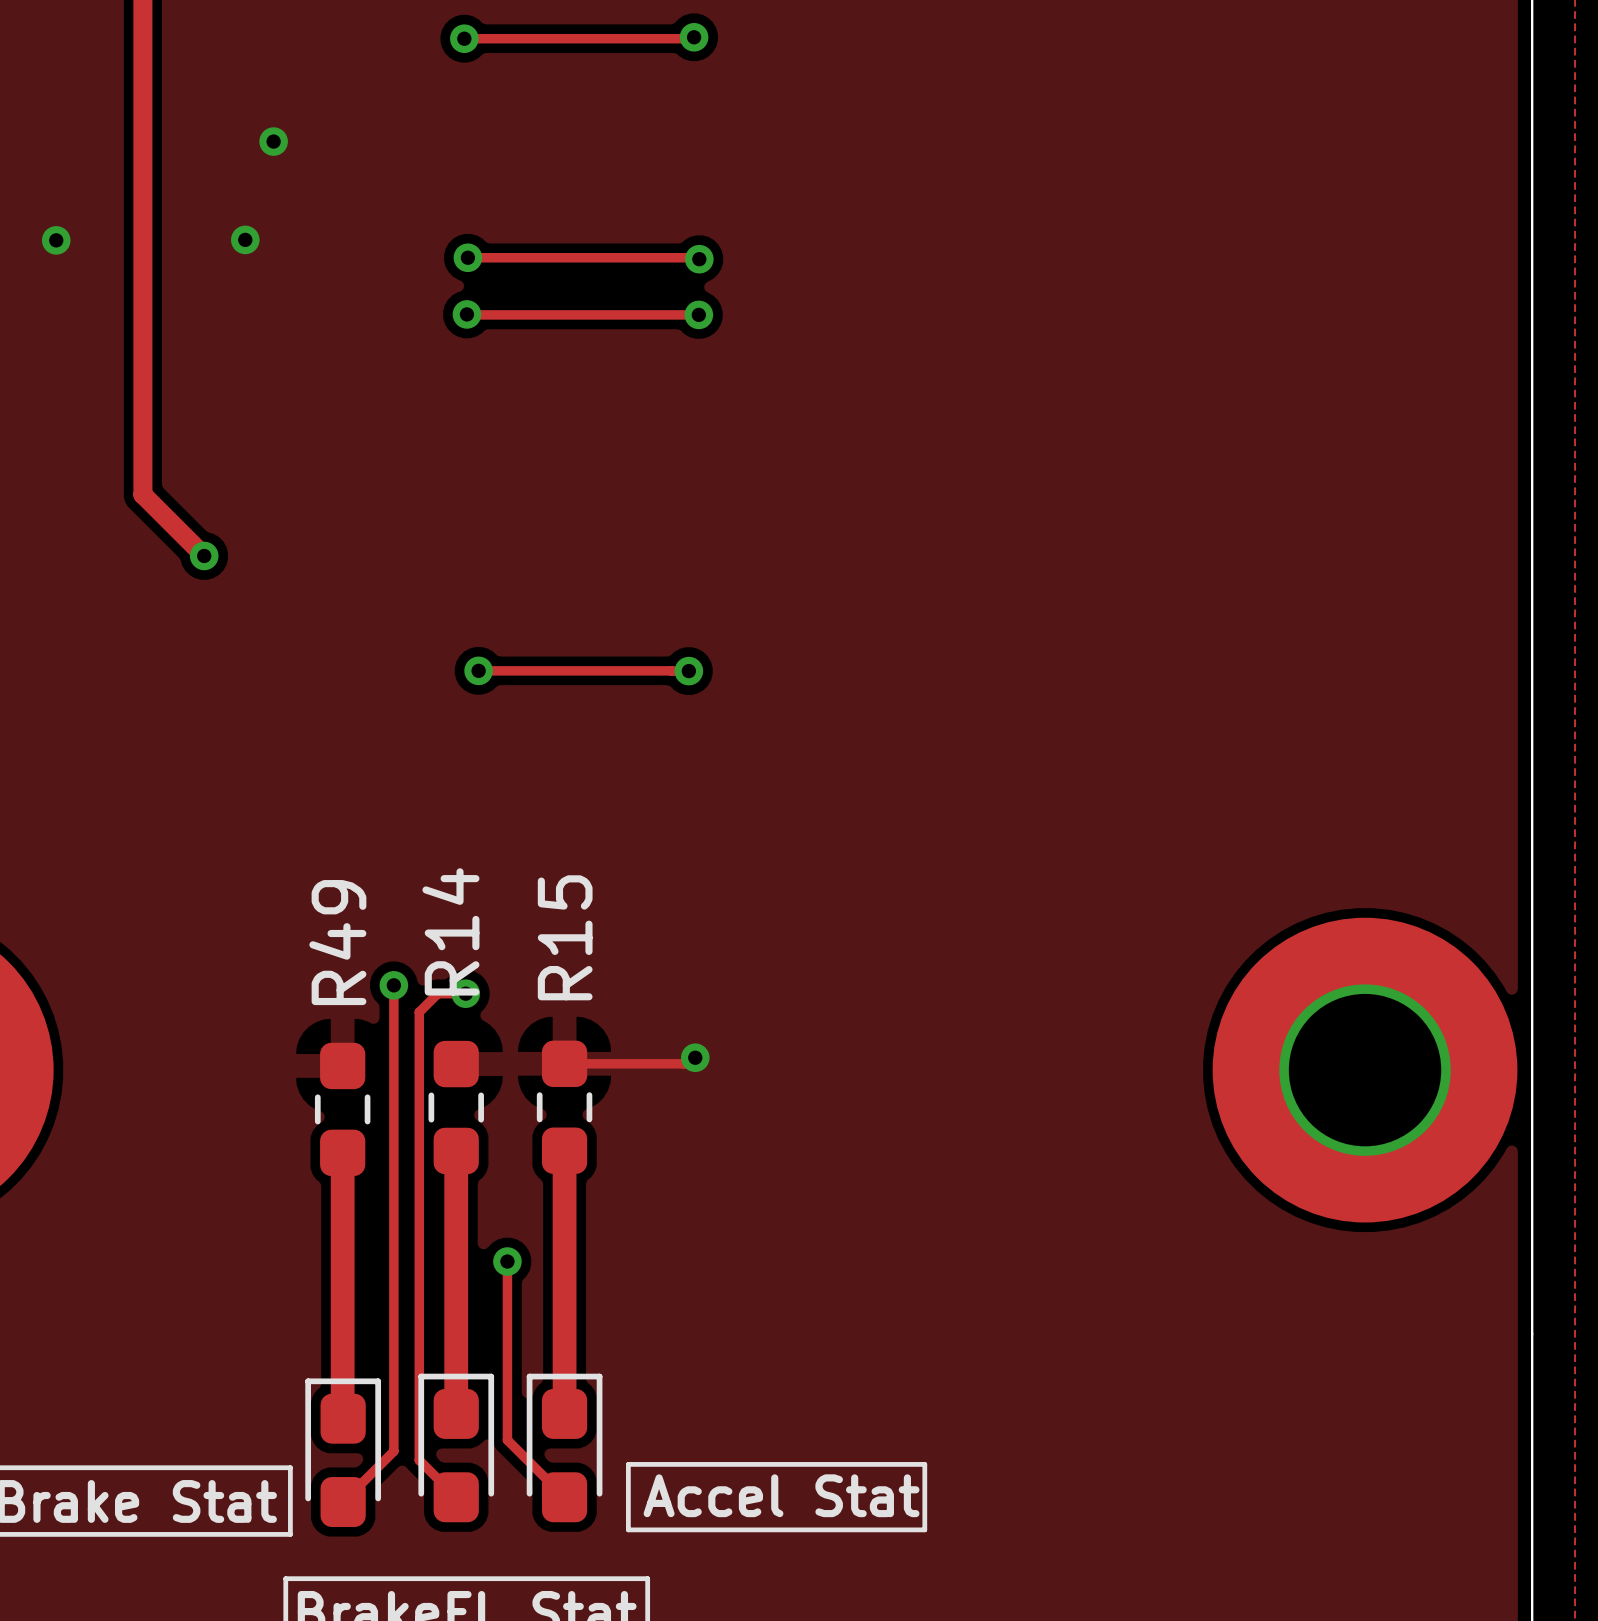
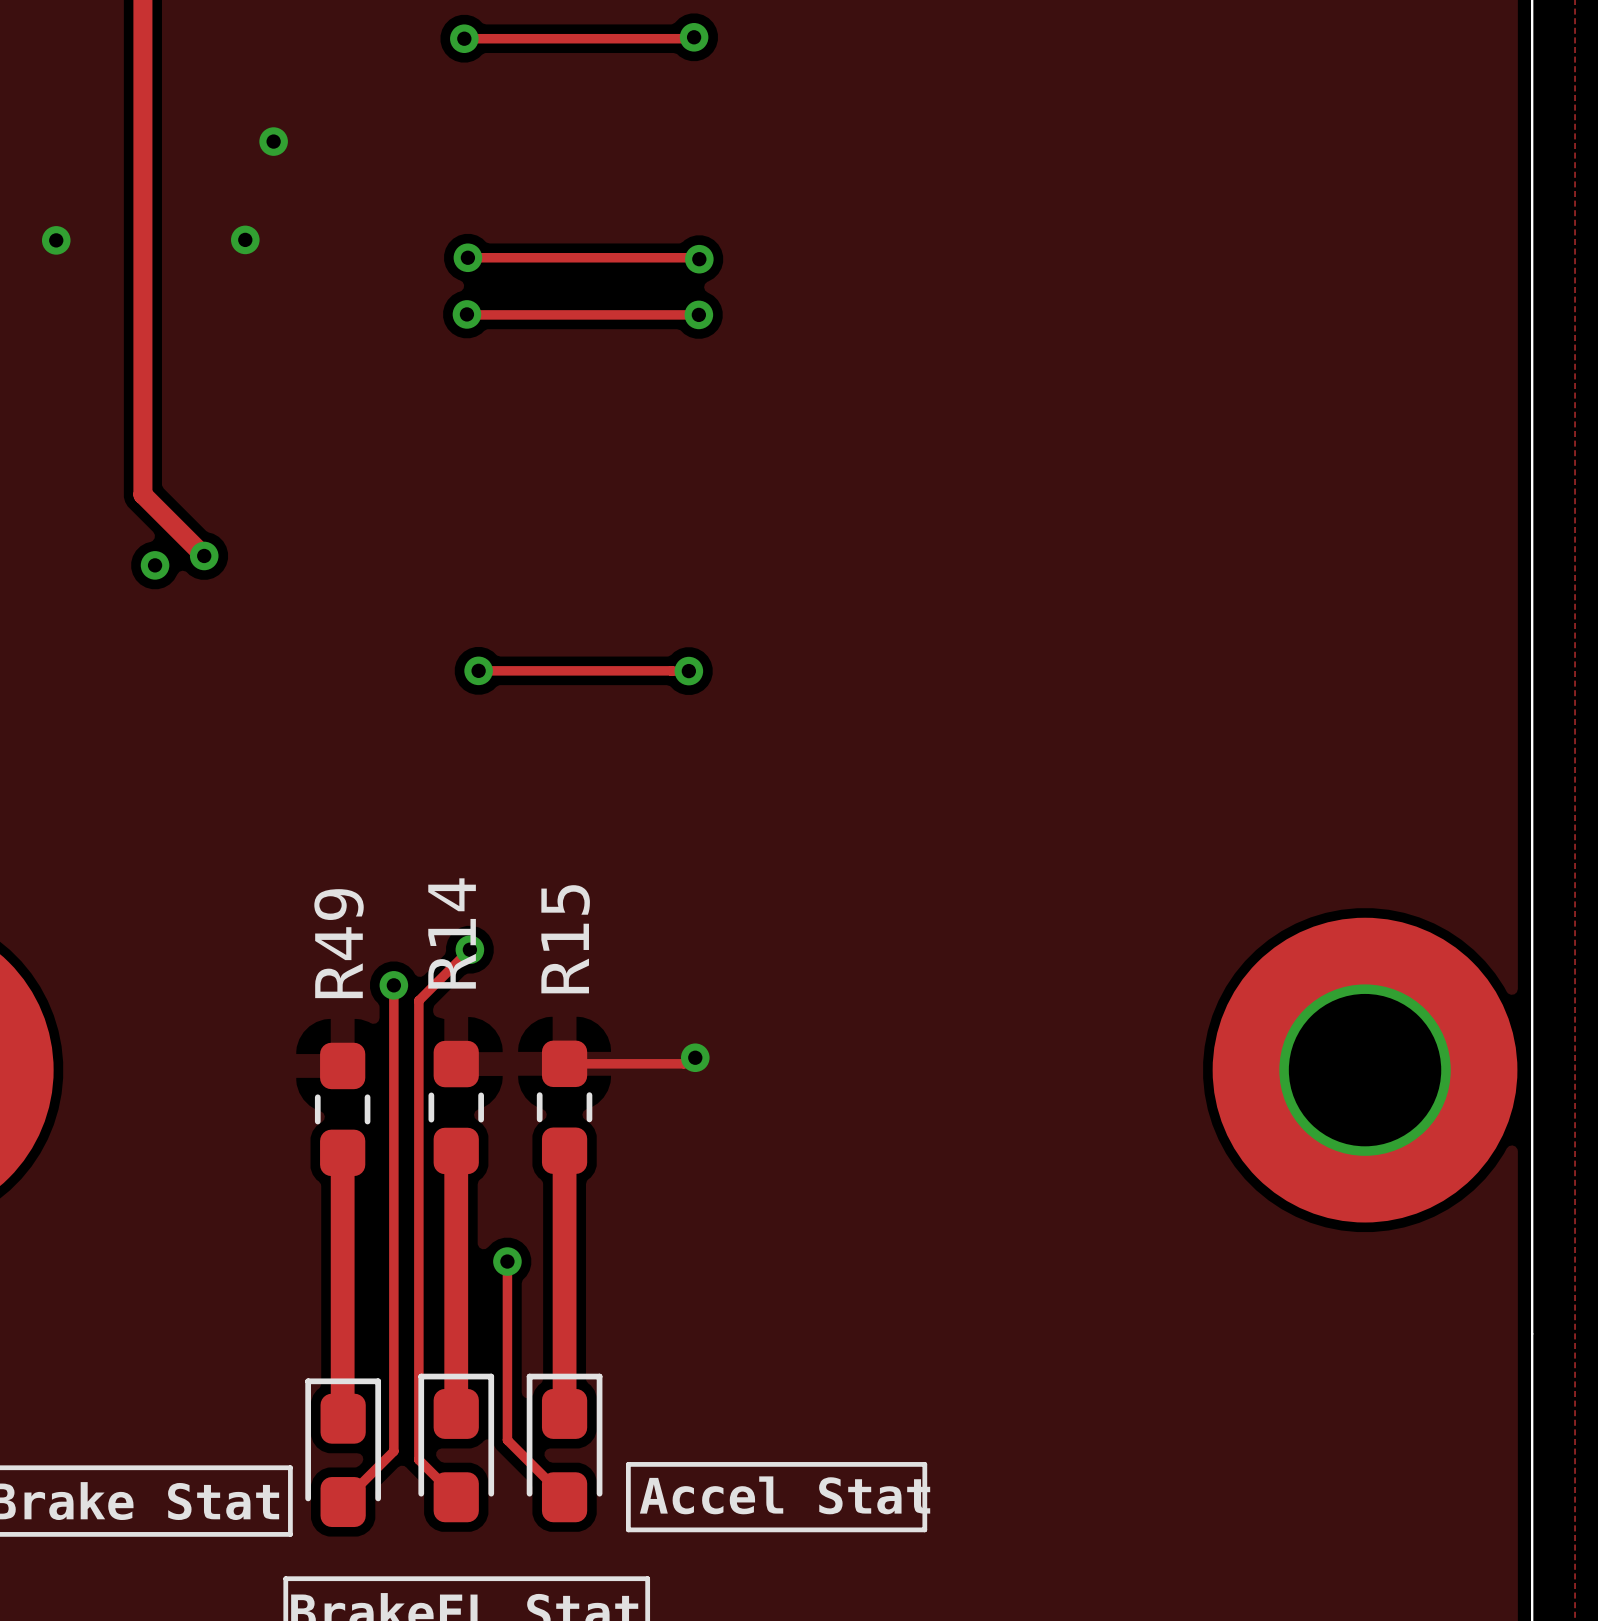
via: none -> (155, 565)
track: (465, 993) (437, 993) (419, 1012) (419, 1460) -> (469, 949) (418, 1000) (418, 1459)
via position: (465, 993) -> (469, 949)

